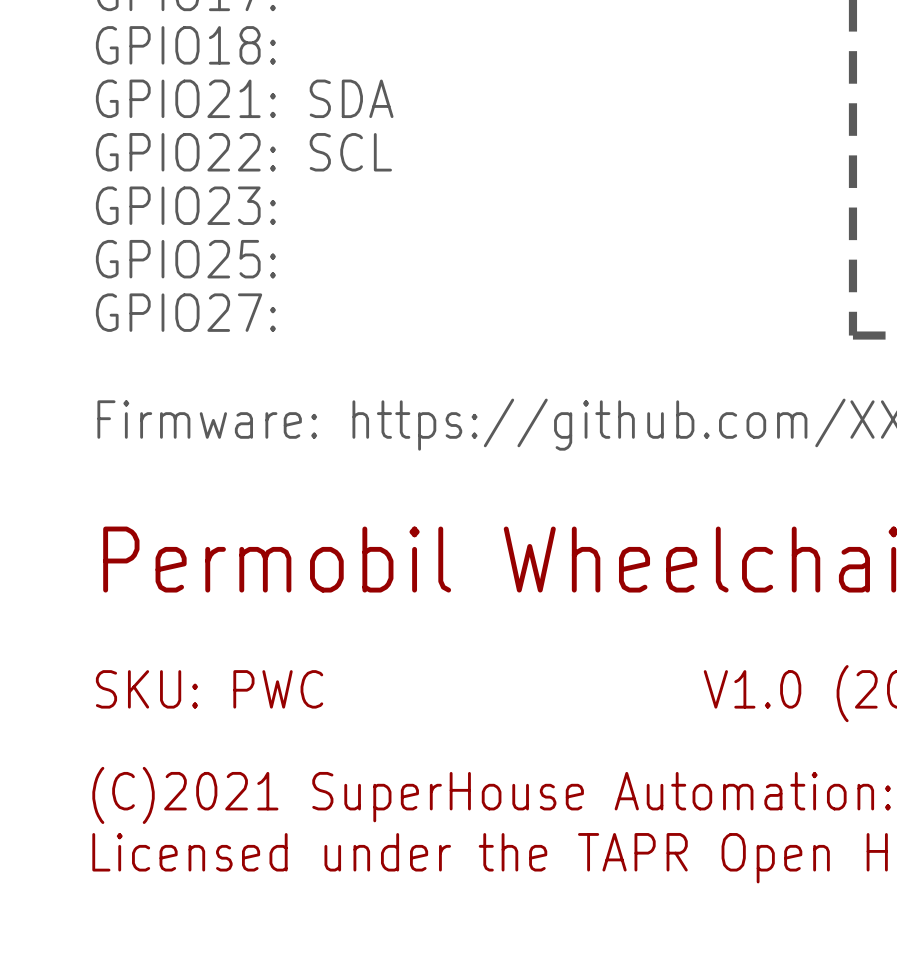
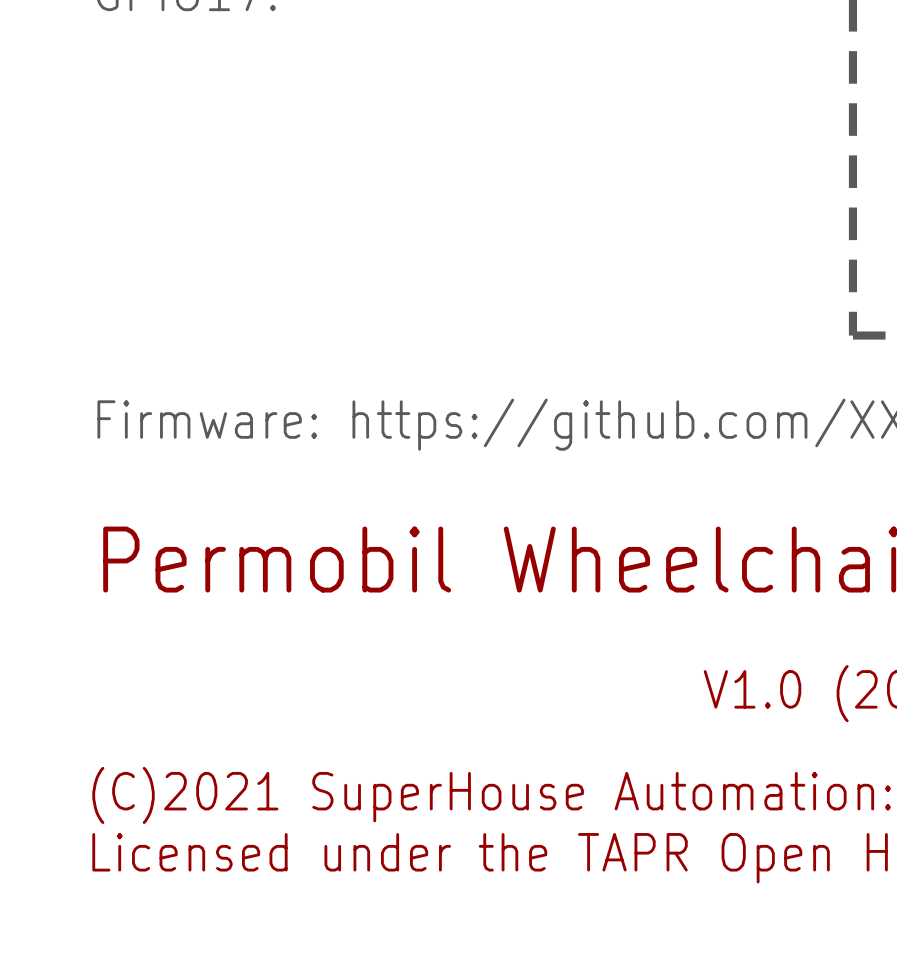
text: GPIO18: (185, 45) -> none
text: GPIO21: SDA (244, 98) -> none
text: GPIO22: SCL (243, 152) -> none
text: GPIO23: (185, 205) -> none
text: GPIO25: (185, 259) -> none
text: GPIO27: (185, 312) -> none
text: SKU: PWC (209, 689) -> none

